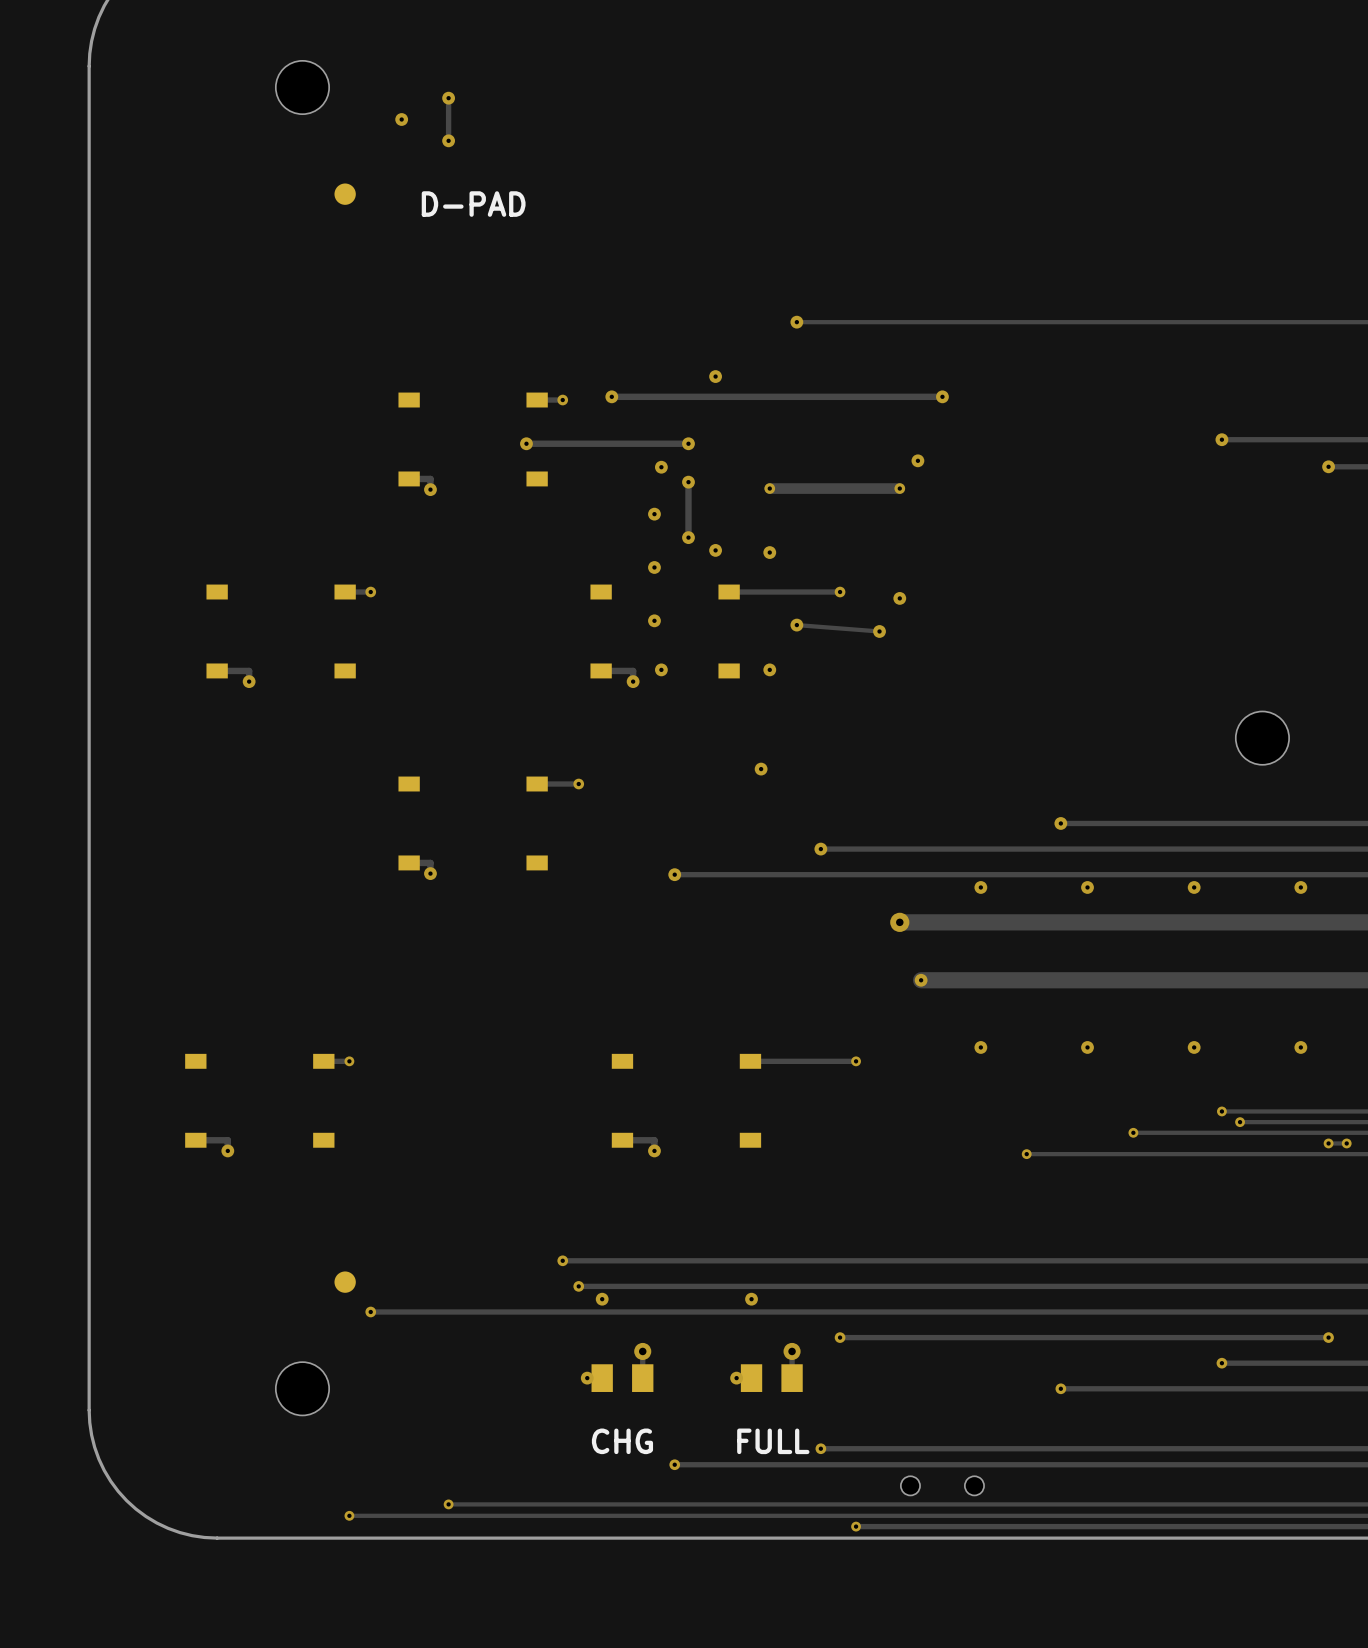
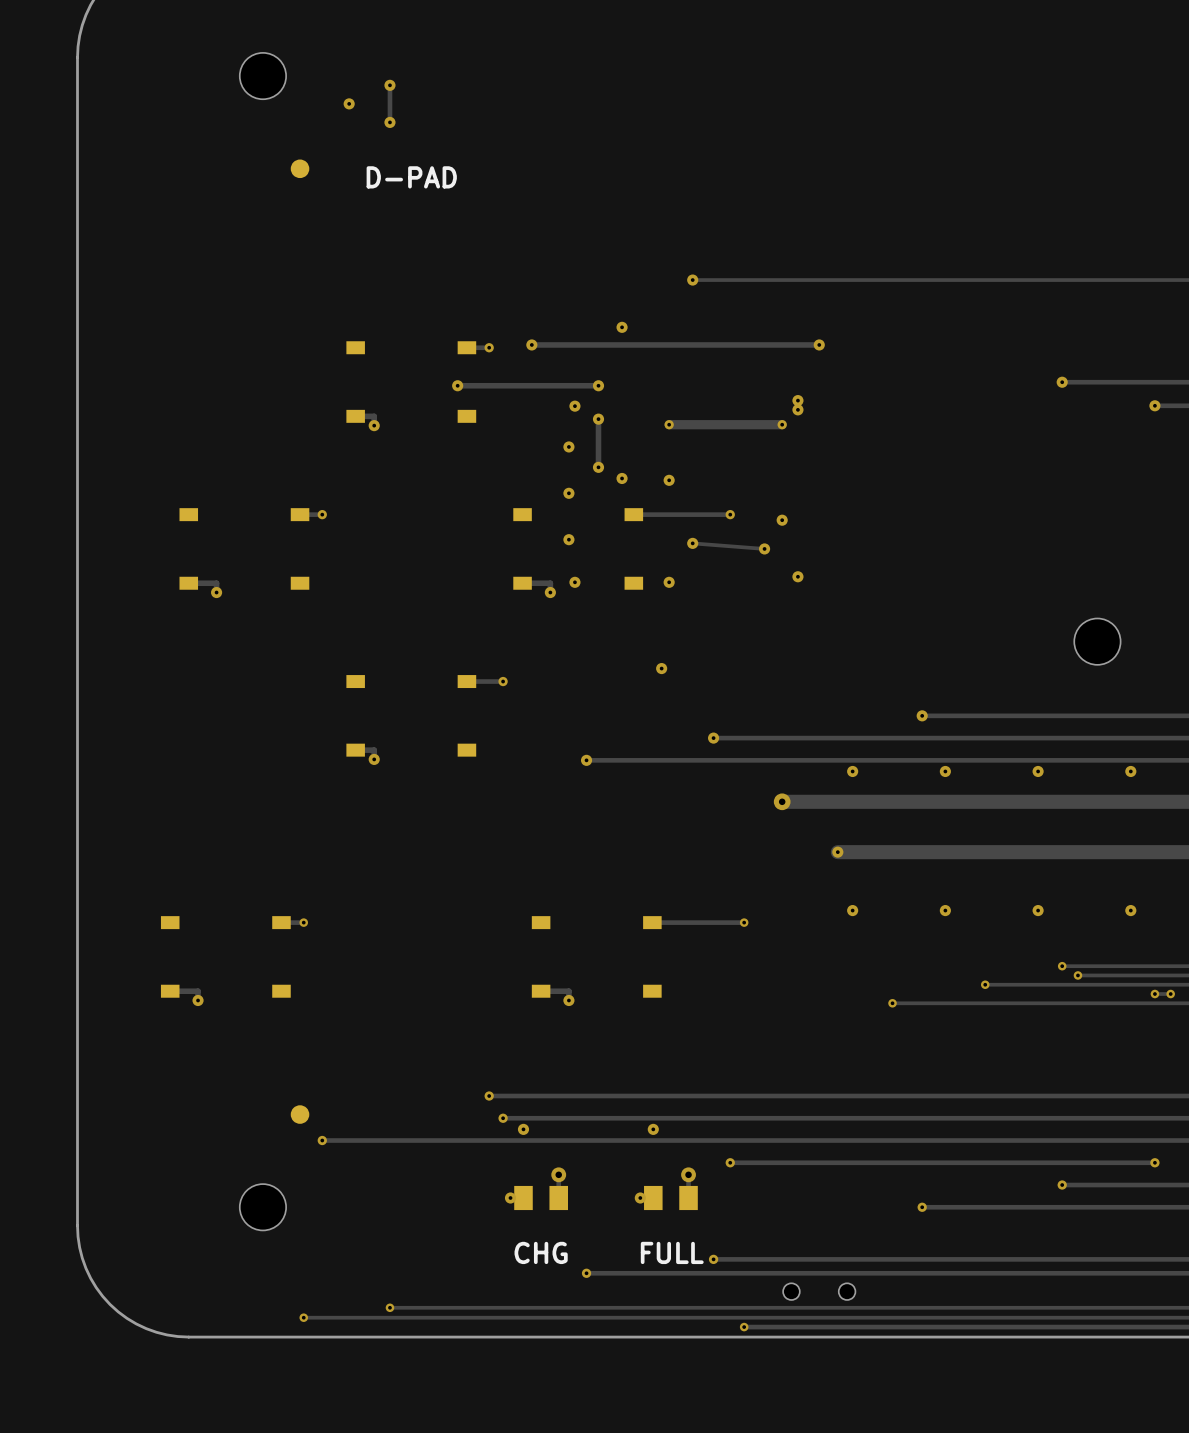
via: none -> (797, 409)
via: none -> (797, 576)
track: (921, 980) (963, 980) -> none
via position: (921, 980) -> (837, 852)

